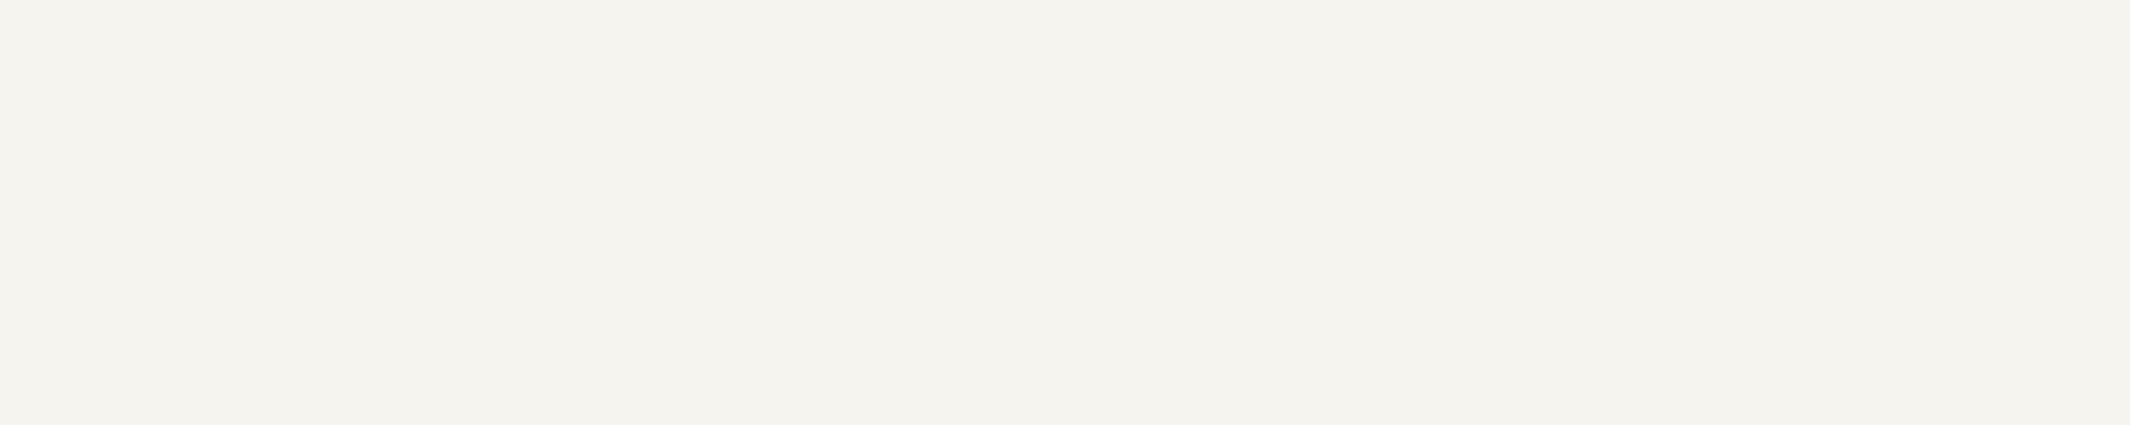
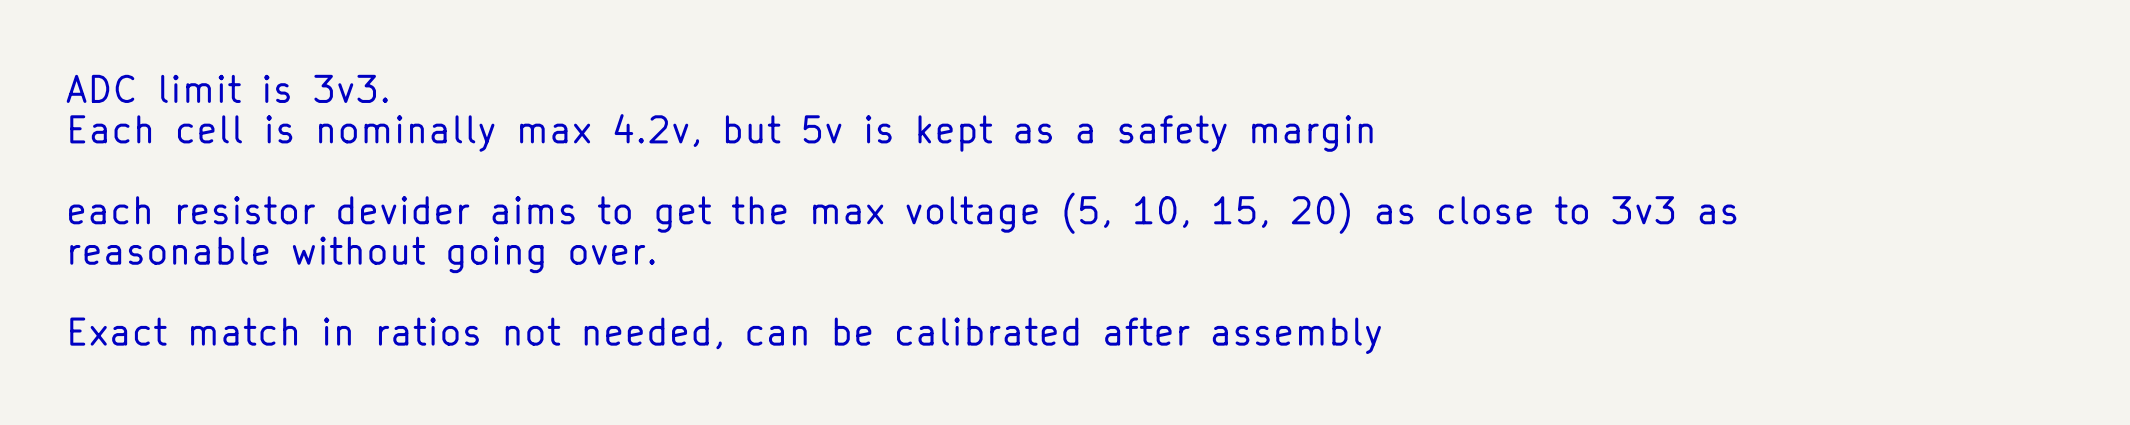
text: none -> ADC limit is 3v3. (227, 88)
text: none -> Each cell is nominally max 4.2v, but 5v is kept as a safety margin (721, 132)
text: none -> each resistor devider aims to get the max voltage (5, 10, 15, 20) as close to 3v3 as (902, 213)
text: none -> reasonable without going over. (362, 254)
text: none -> Exact match in ratios not needed, can be calibrated after assembly (725, 335)

